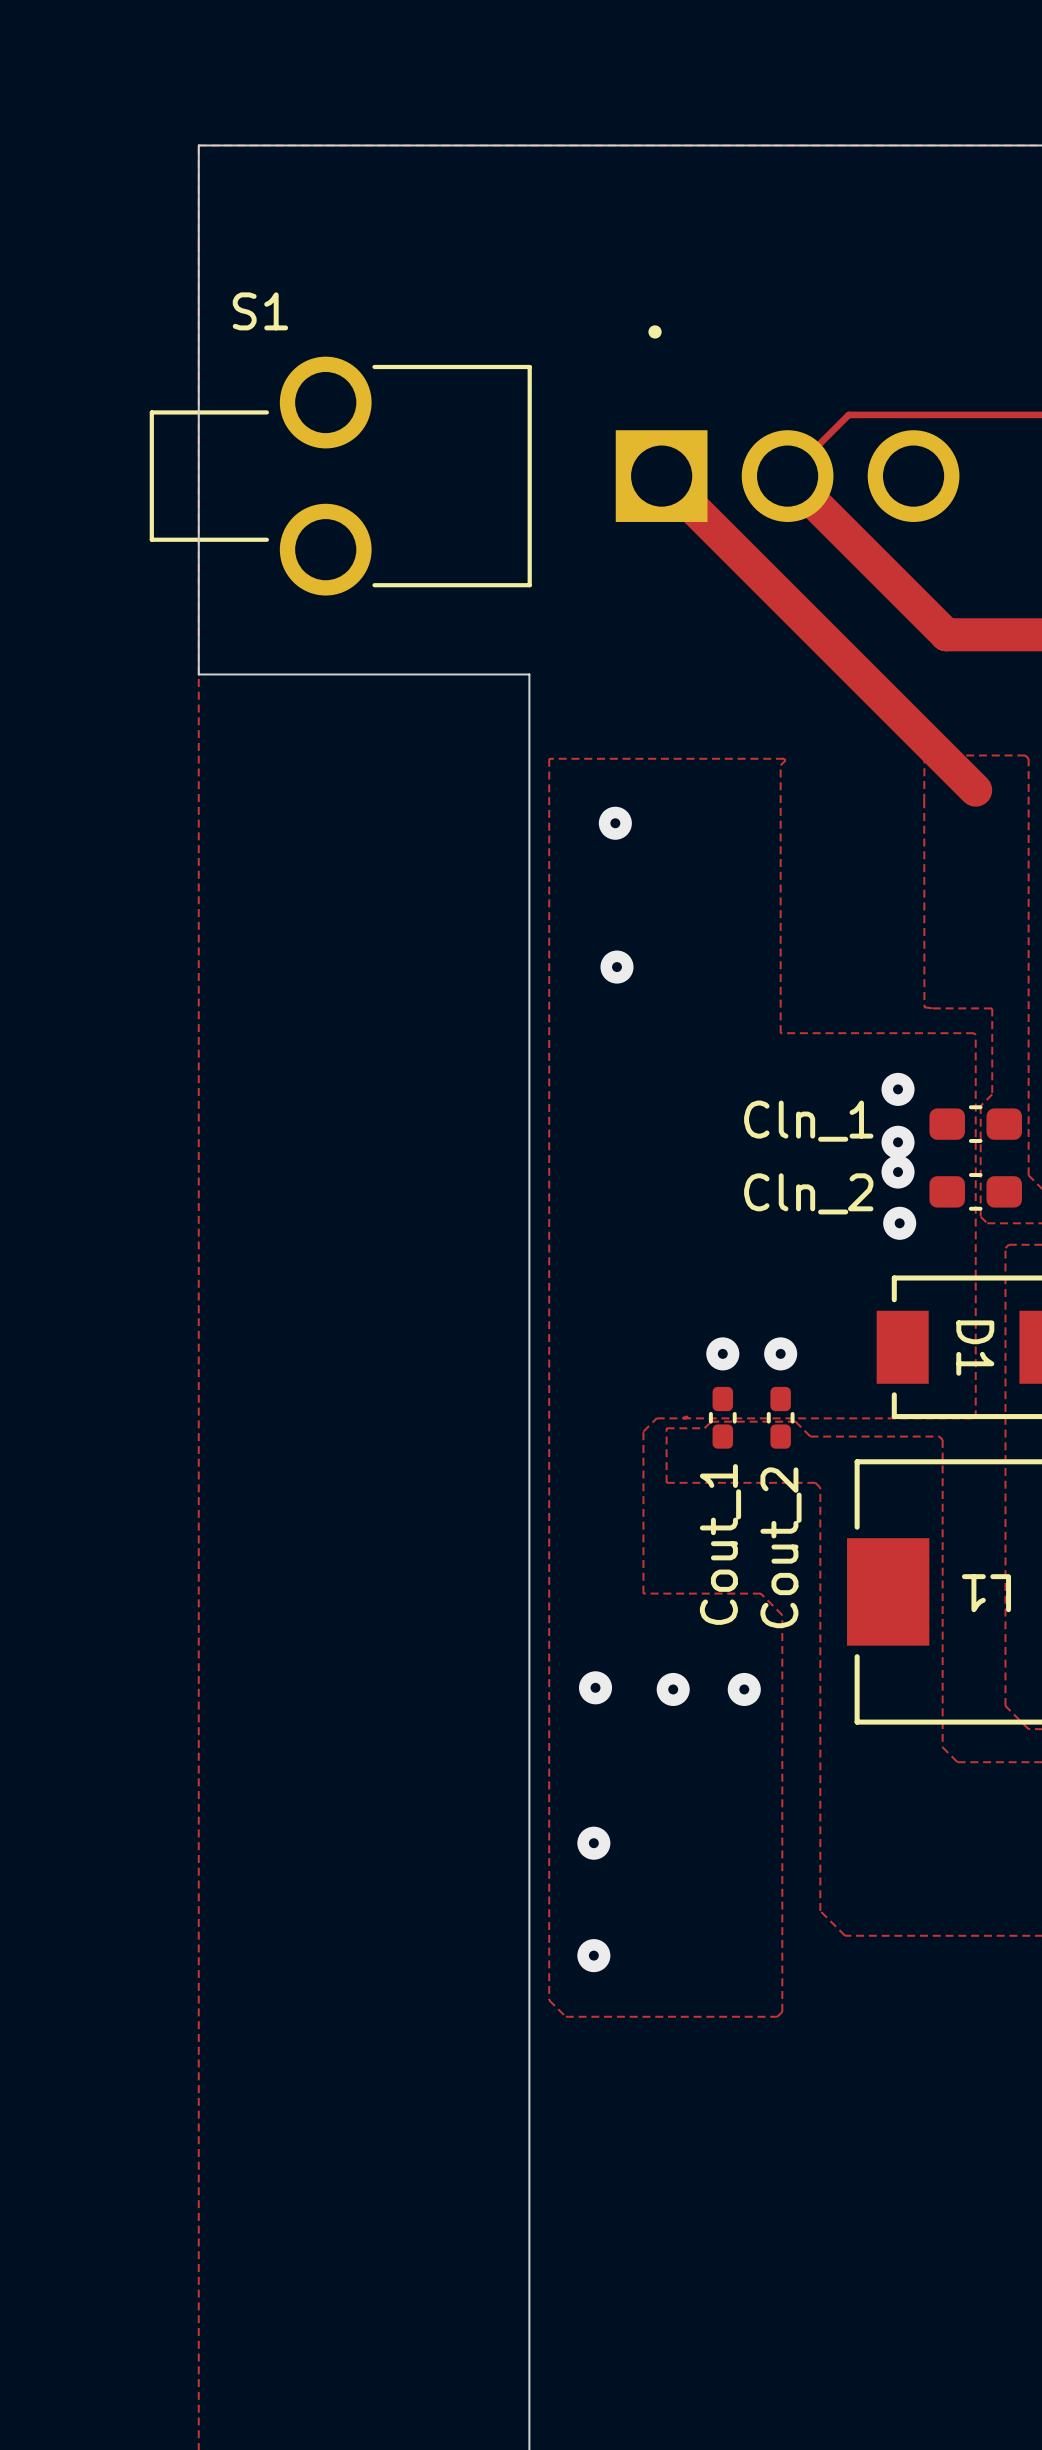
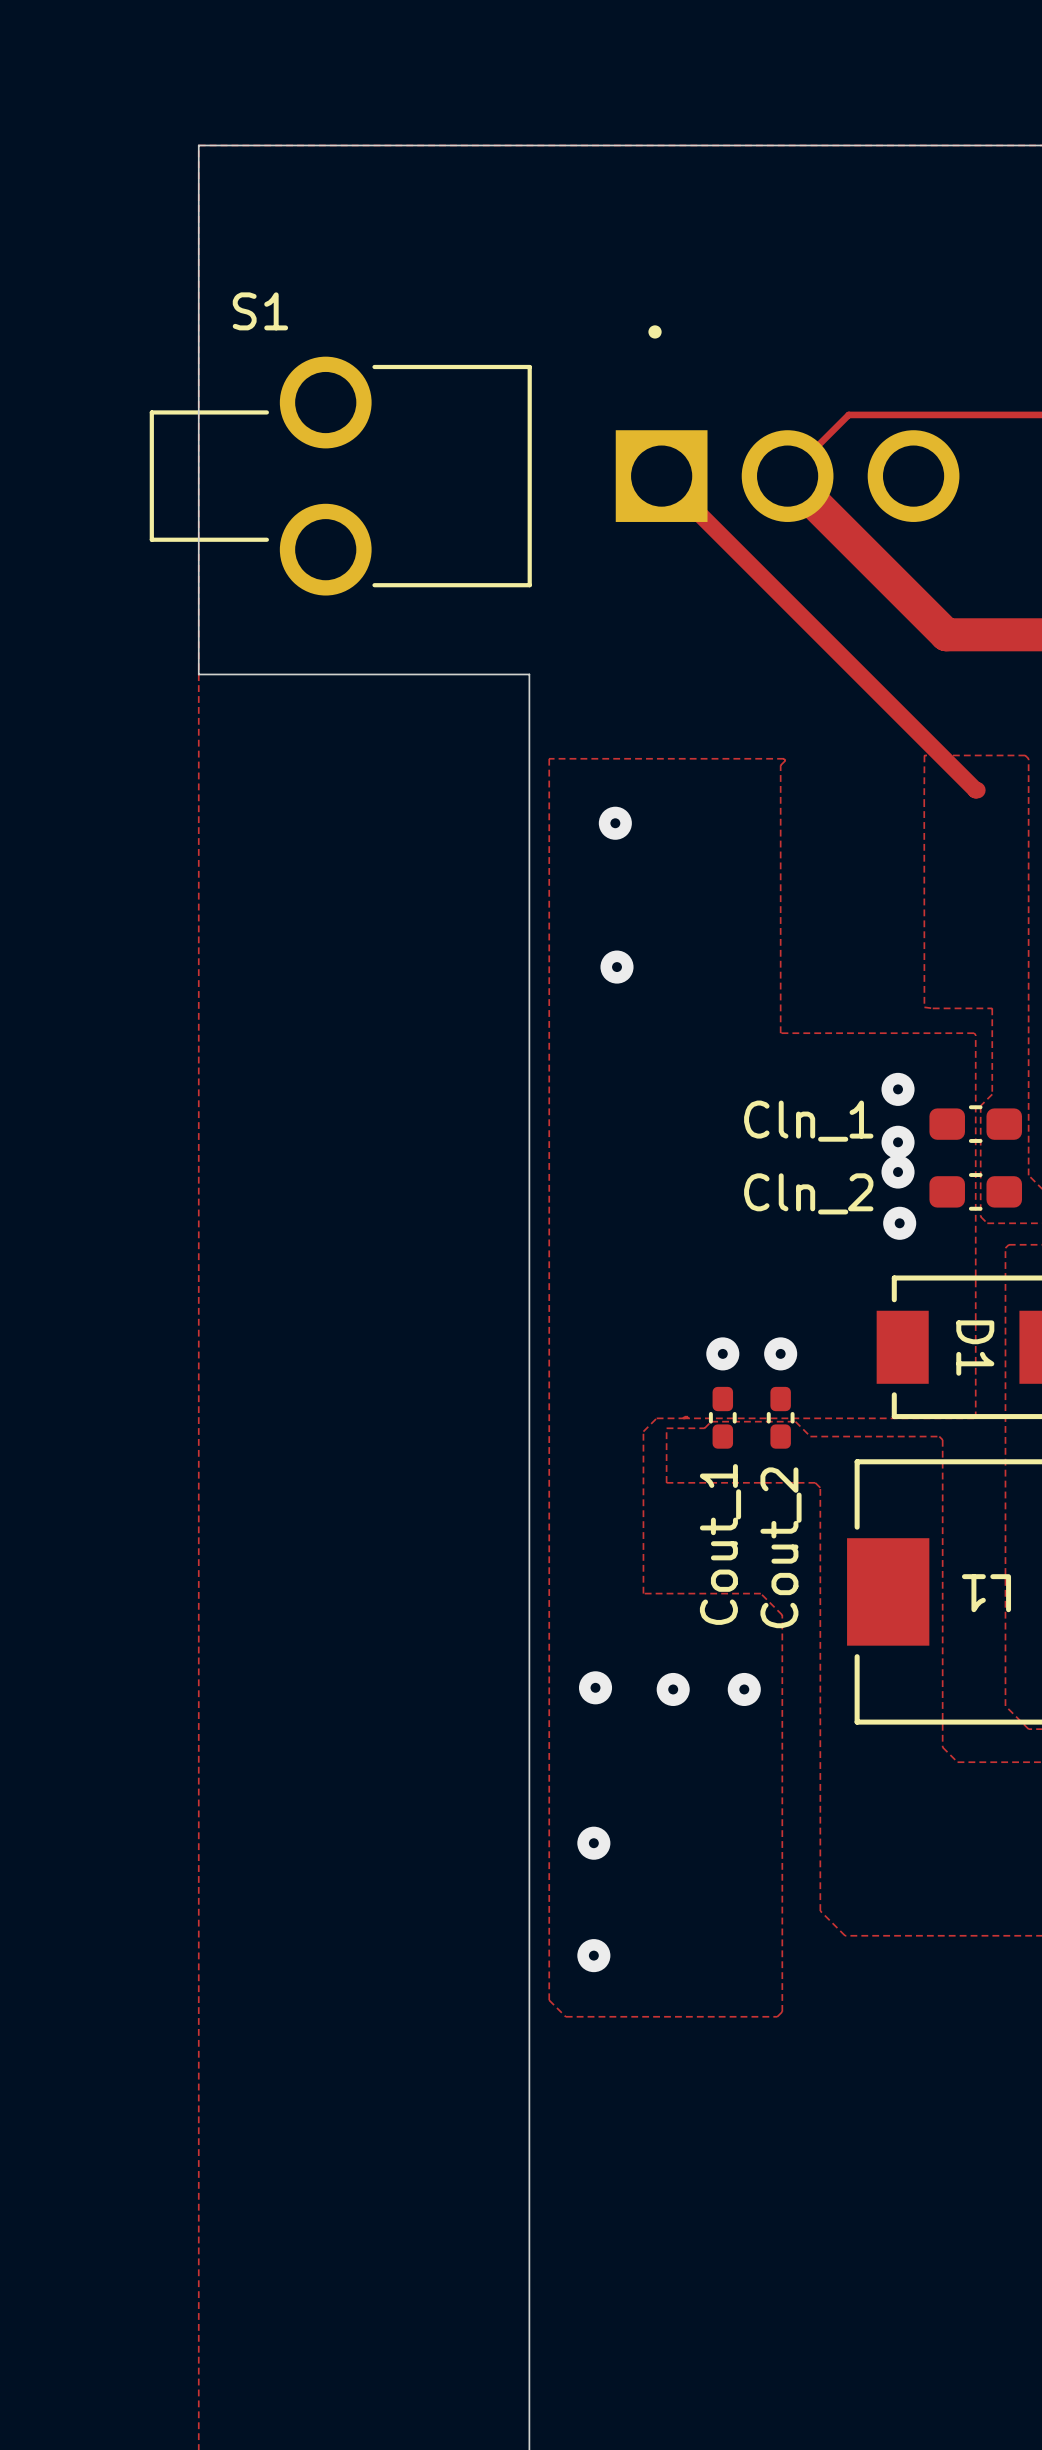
track width: thick (661, 476) (975, 790) -> thin (661, 476) (975, 790)

